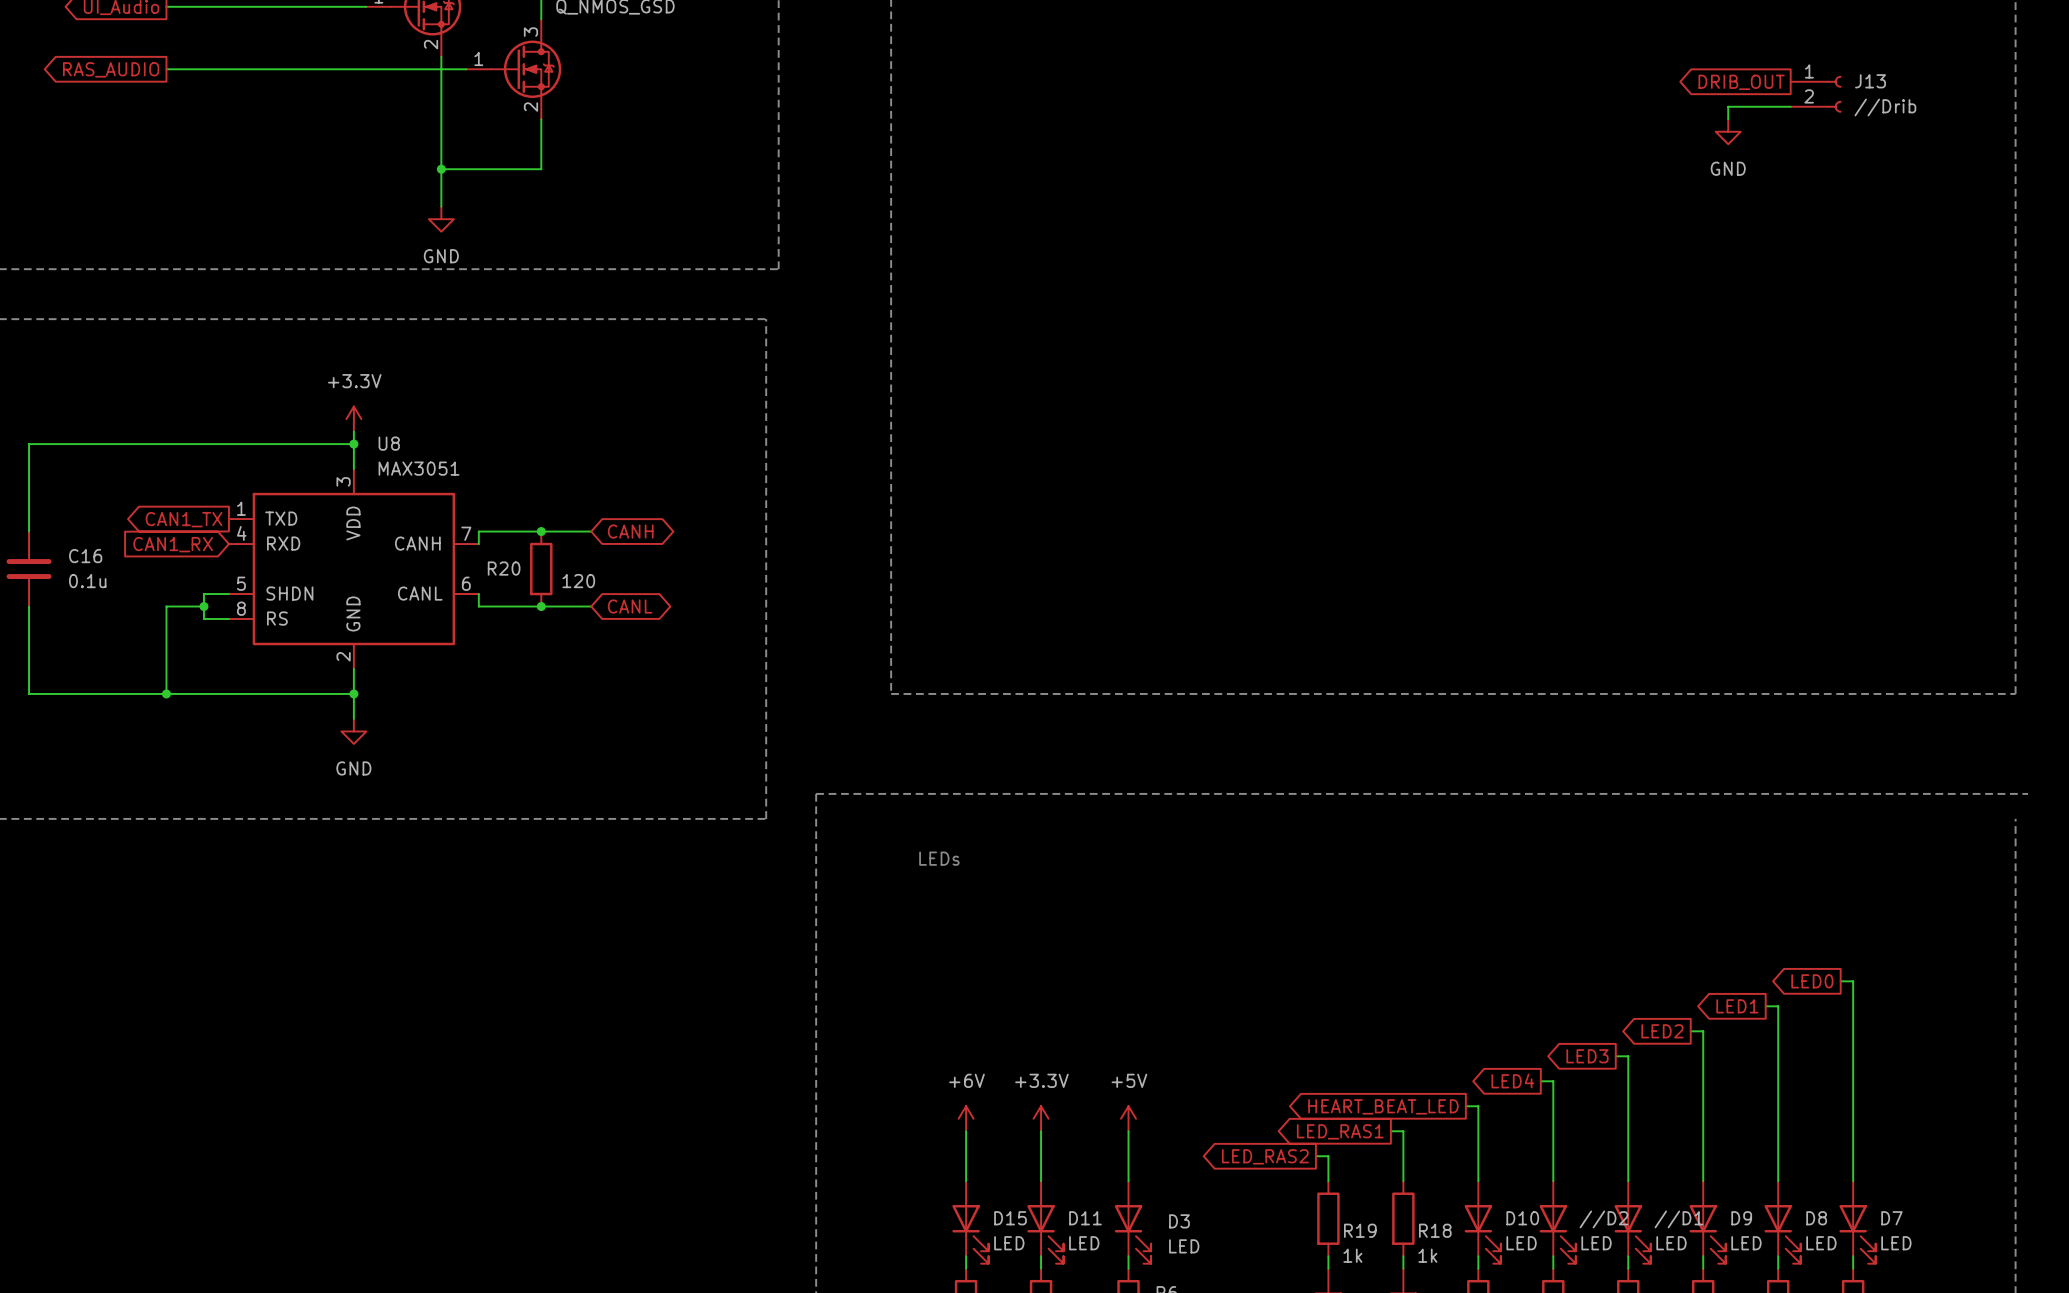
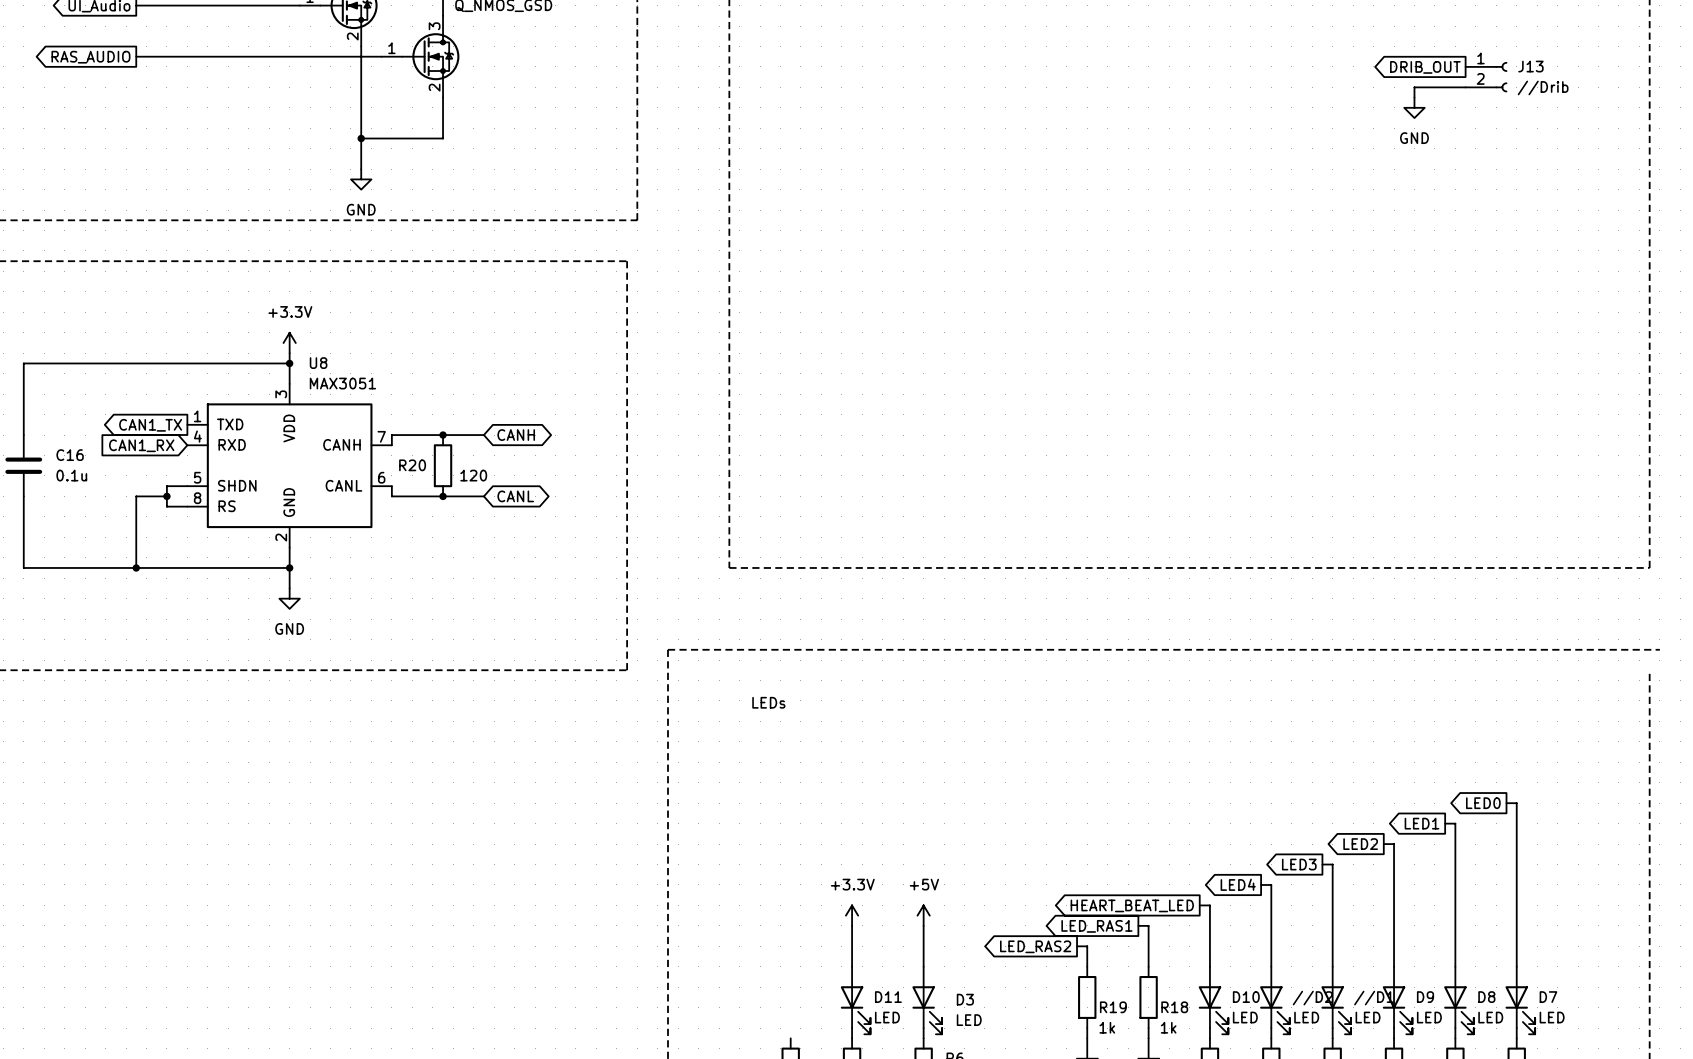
power symbol: +6V (966, 1118) -> none
wire: (966, 1131) (966, 1181) -> none
D15: LED (970, 1222) -> none
wire: (966, 1256) (966, 1268) -> none

